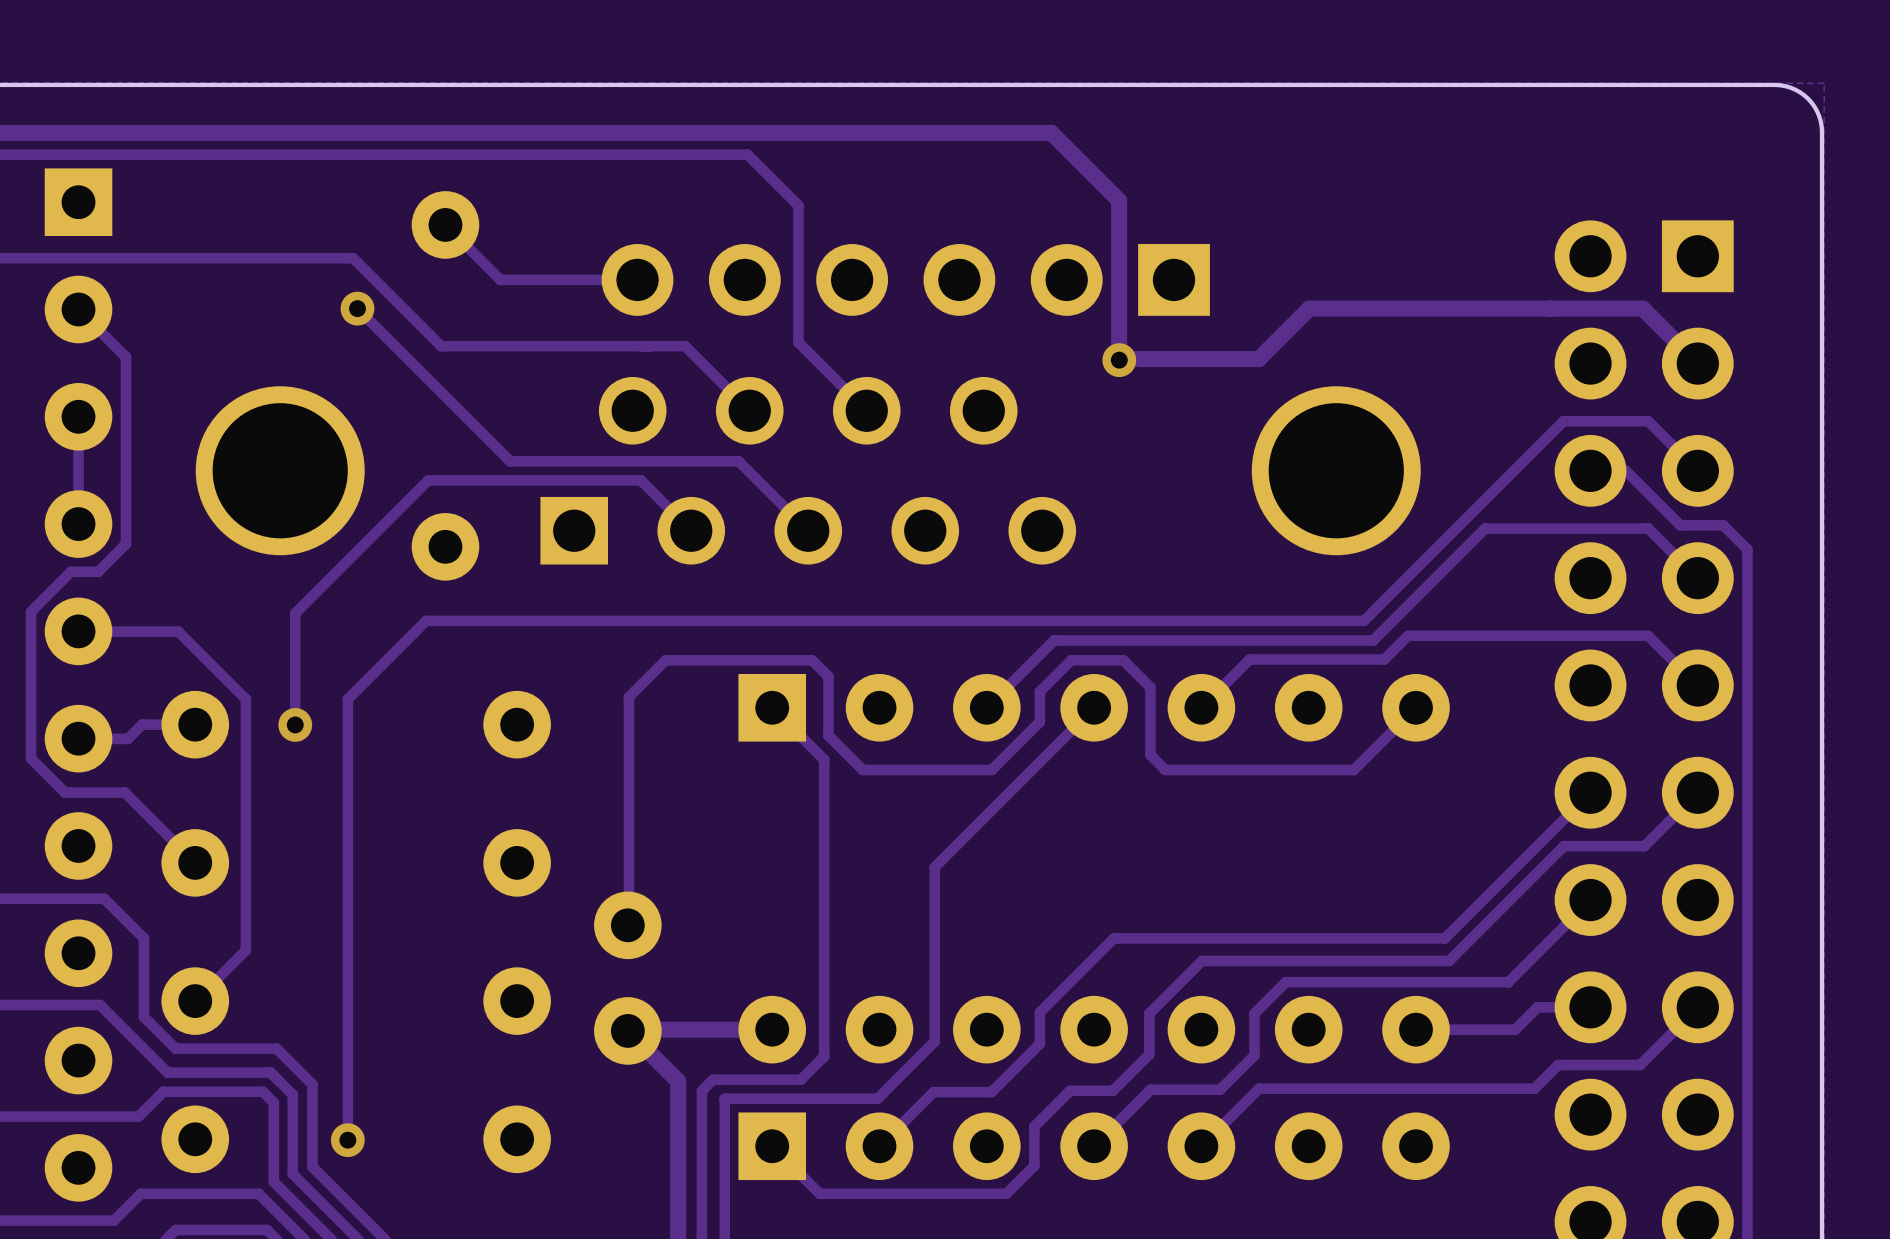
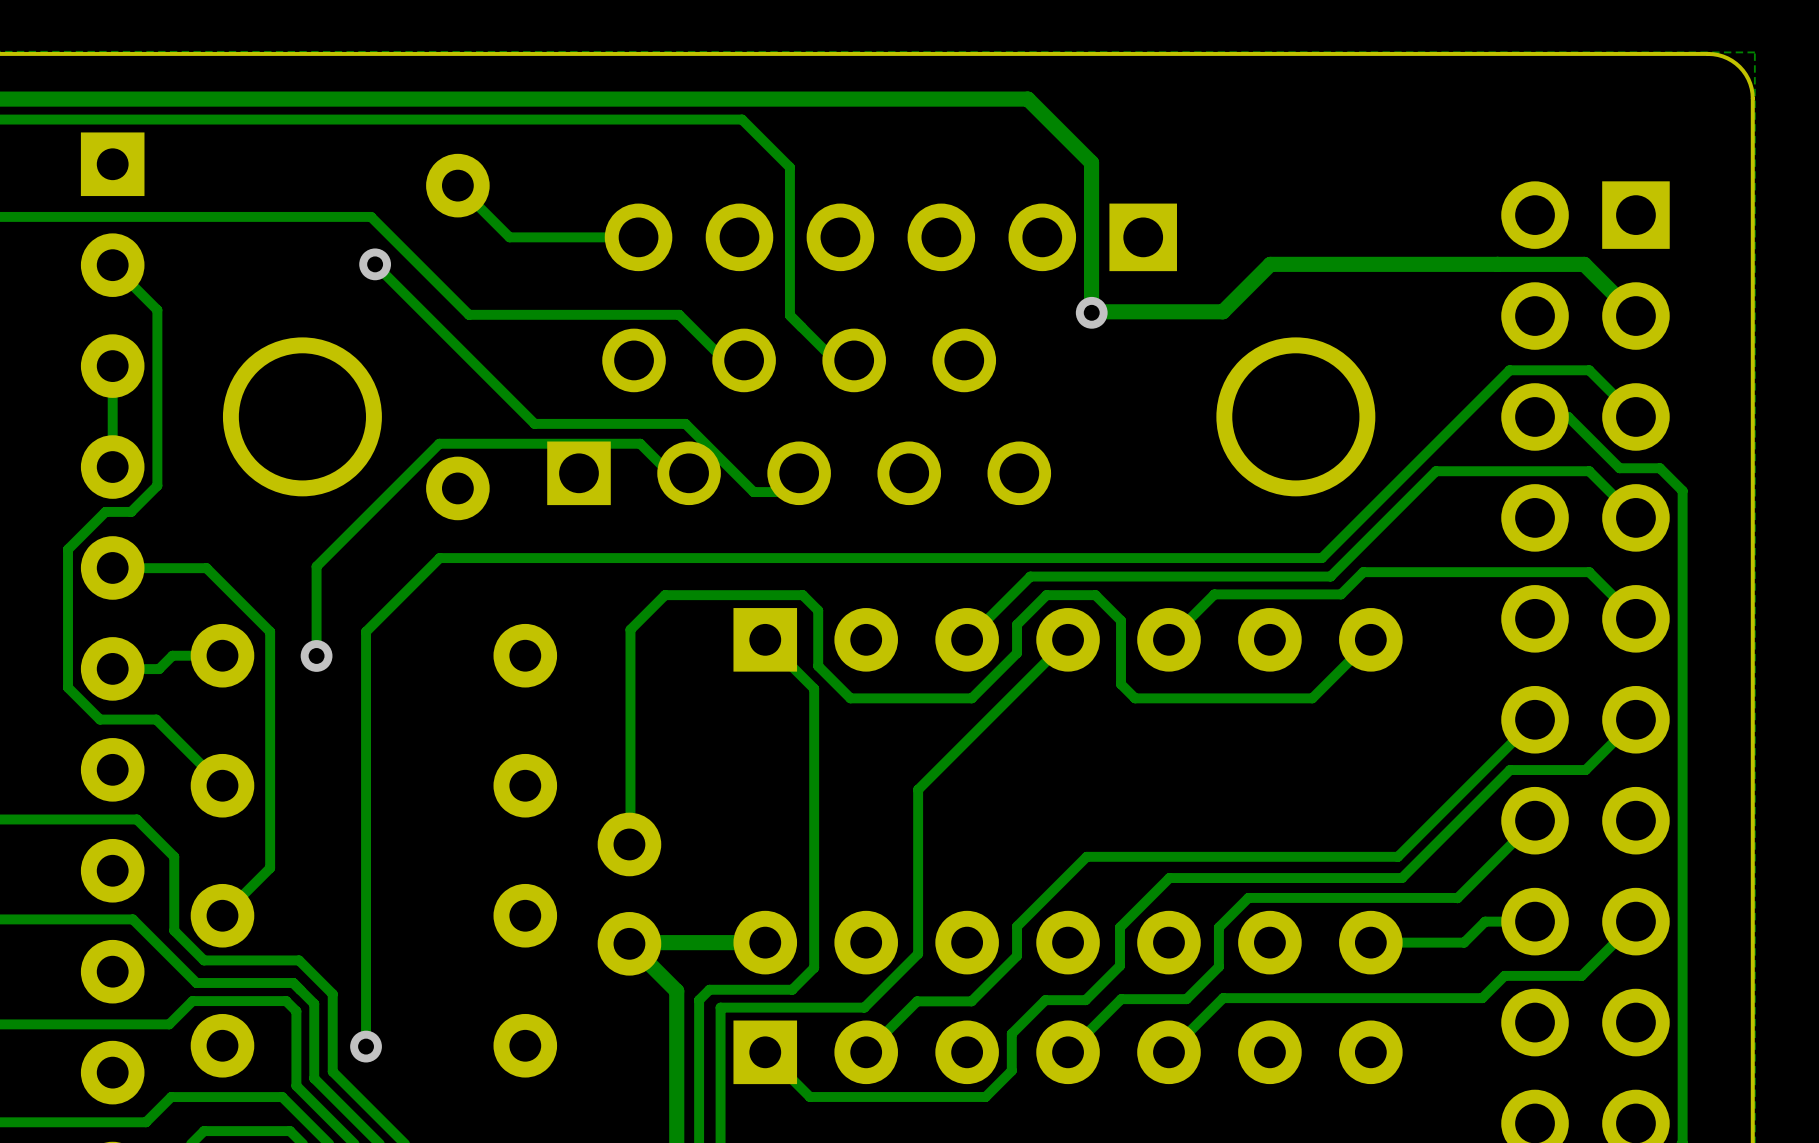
track: (798, 342) (866, 410) -> (789, 296) (789, 315) (853, 379)
track: (441, 346) (685, 346) (749, 410) -> (453, 299) (468, 314) (679, 314) (743, 379)
track: (510, 461) (738, 461) (807, 530) -> (518, 407) (534, 423) (685, 423) (753, 492) (798, 492)
track: (691, 530) (640, 480) (428, 480) (295, 613) (295, 629) -> (688, 492) (640, 443) (439, 443) (316, 566)

